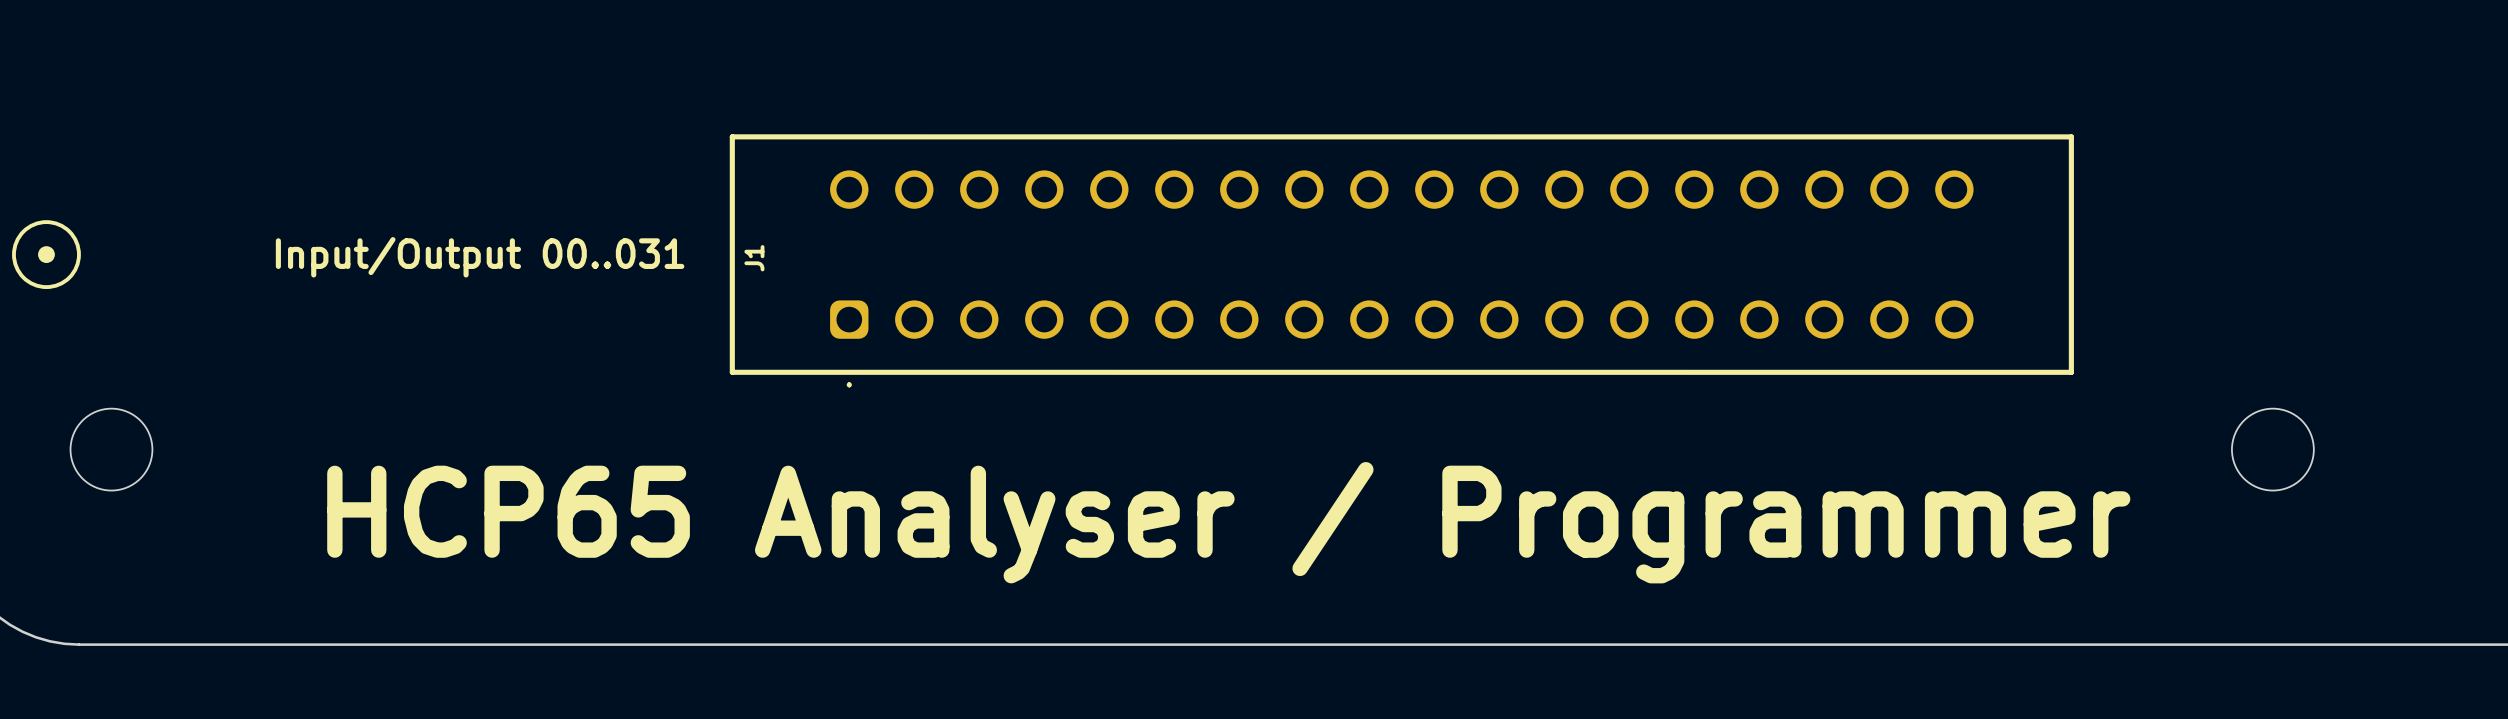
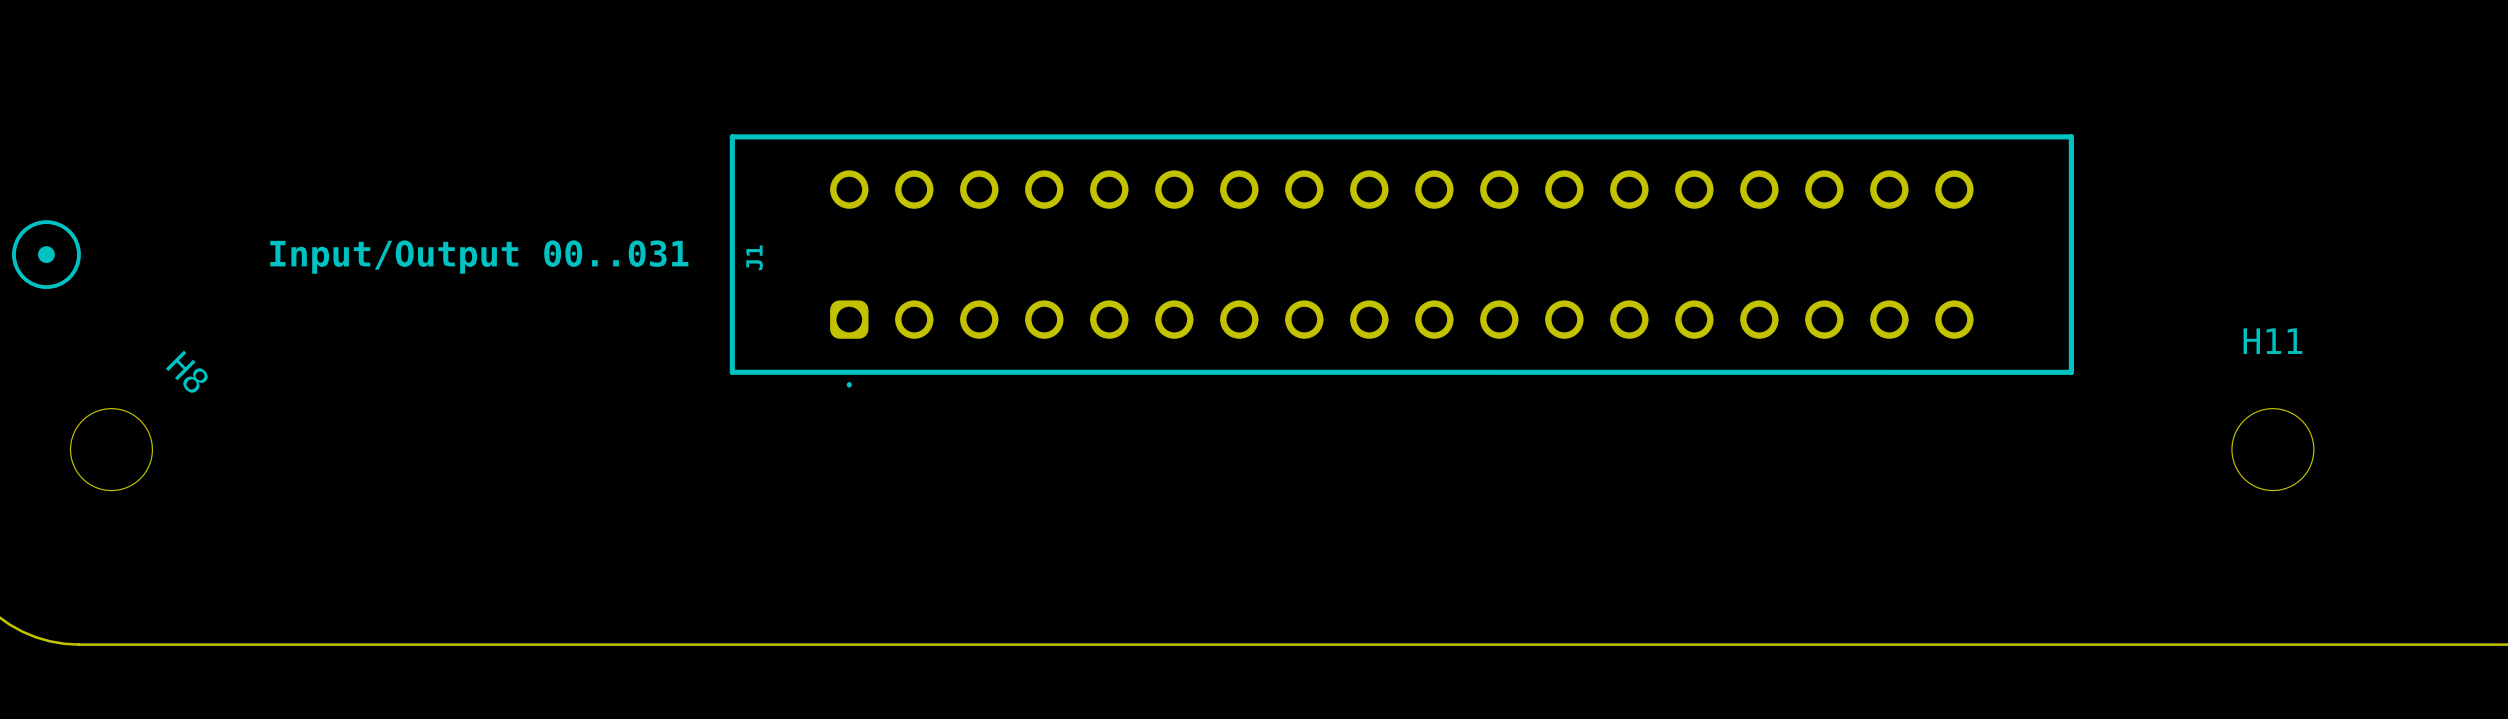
H11 name: none -> H11 (2272, 341)
H8 name: none -> H8 (186, 371)
text: HCP65 Analyser / Programmer (1228, 522) -> none

